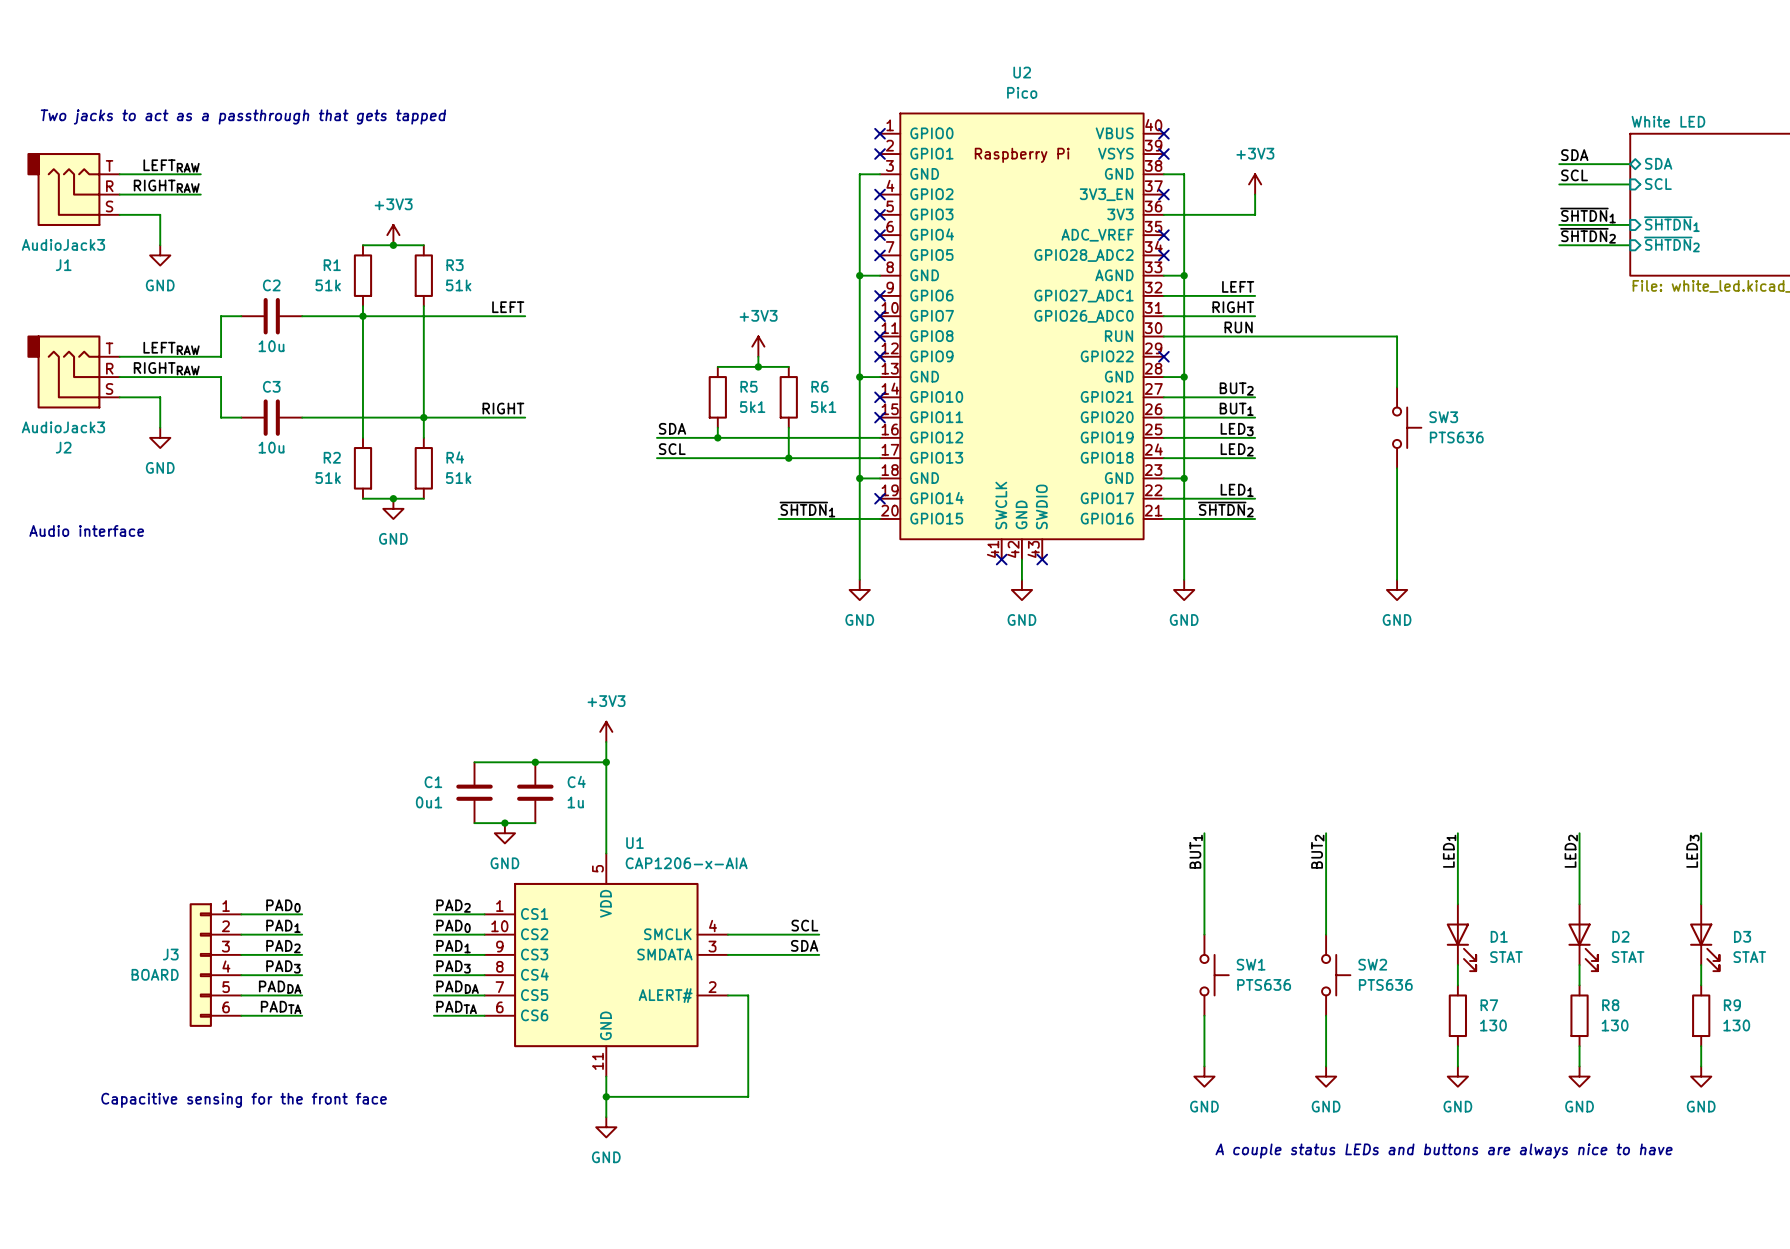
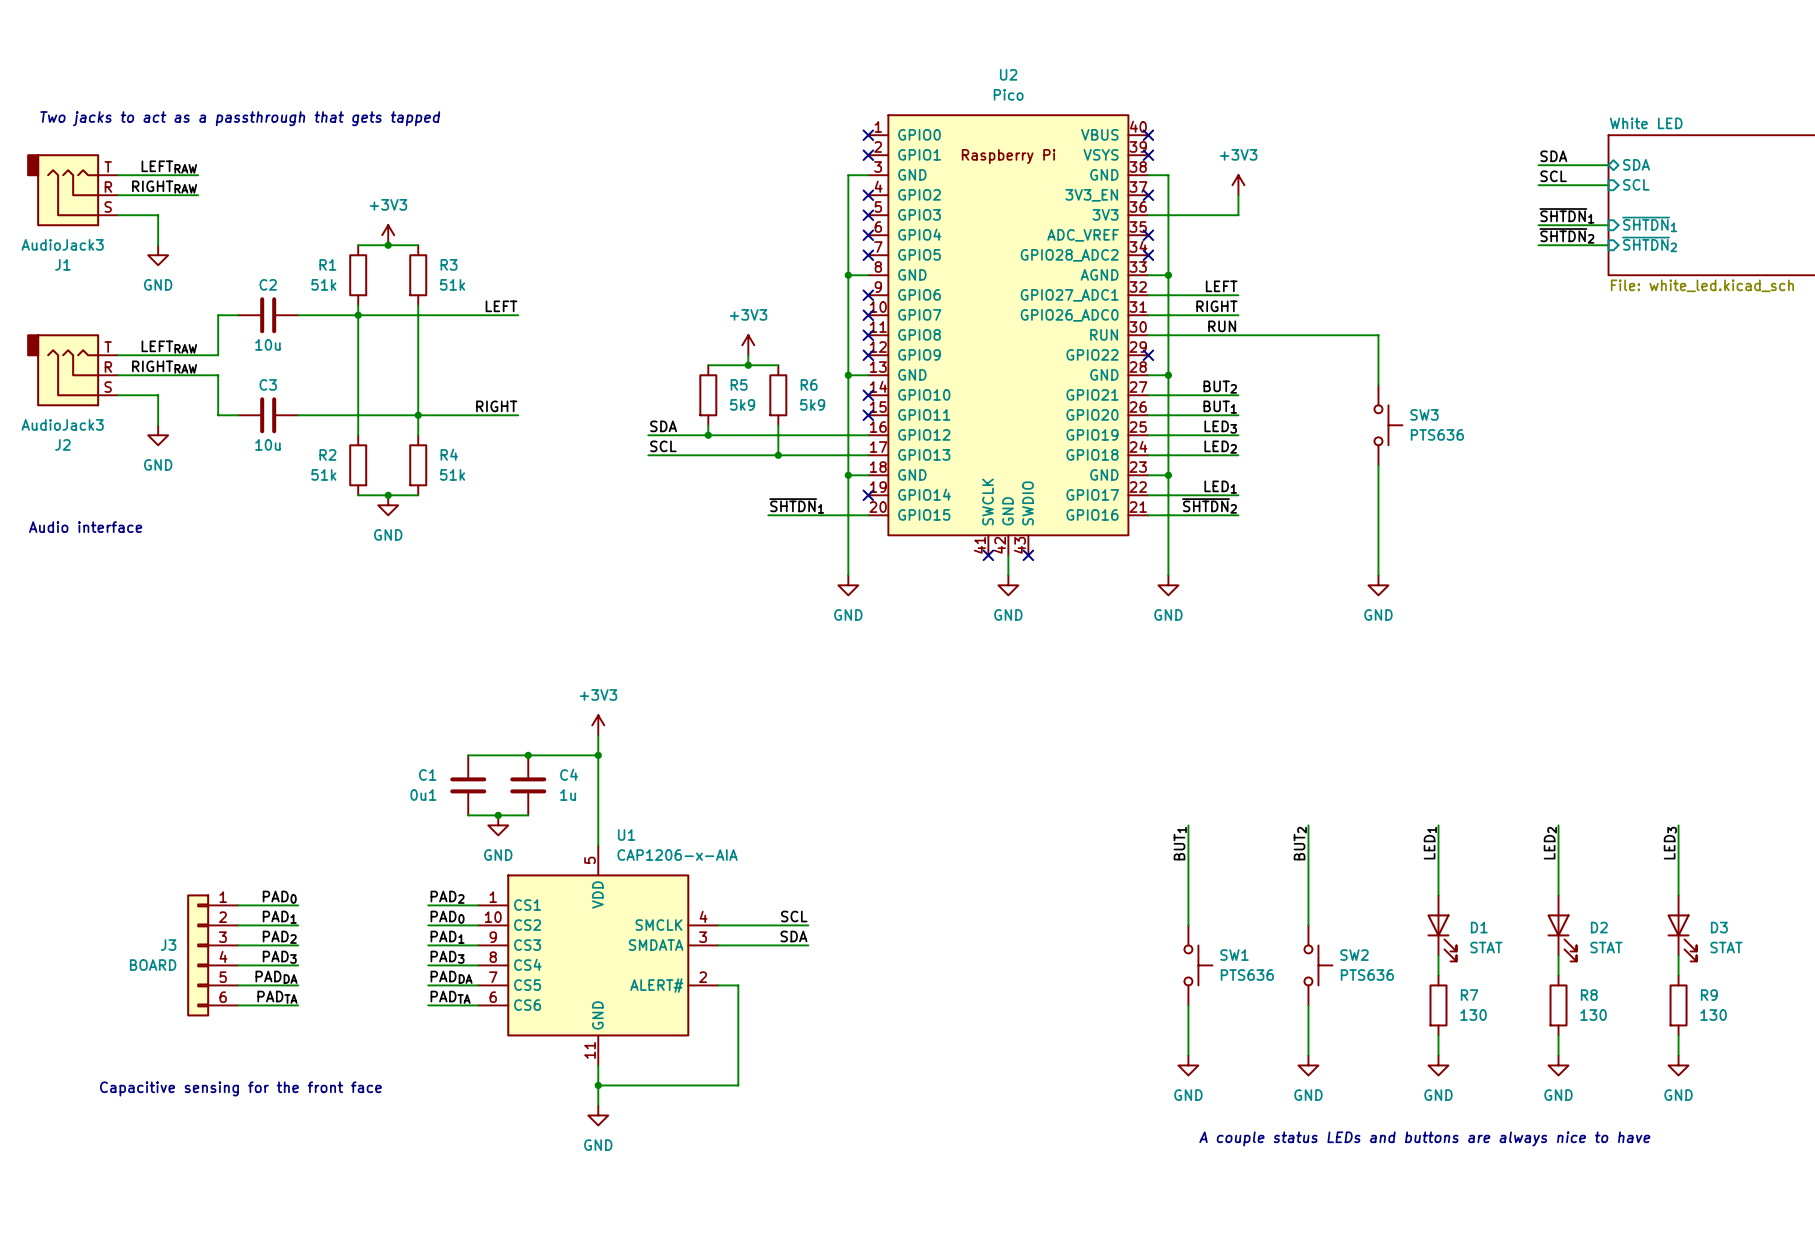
R5 value: 5k1 (752, 407) -> 5k9 (742, 404)
R6 value: 5k1 (823, 407) -> 5k9 (812, 404)

